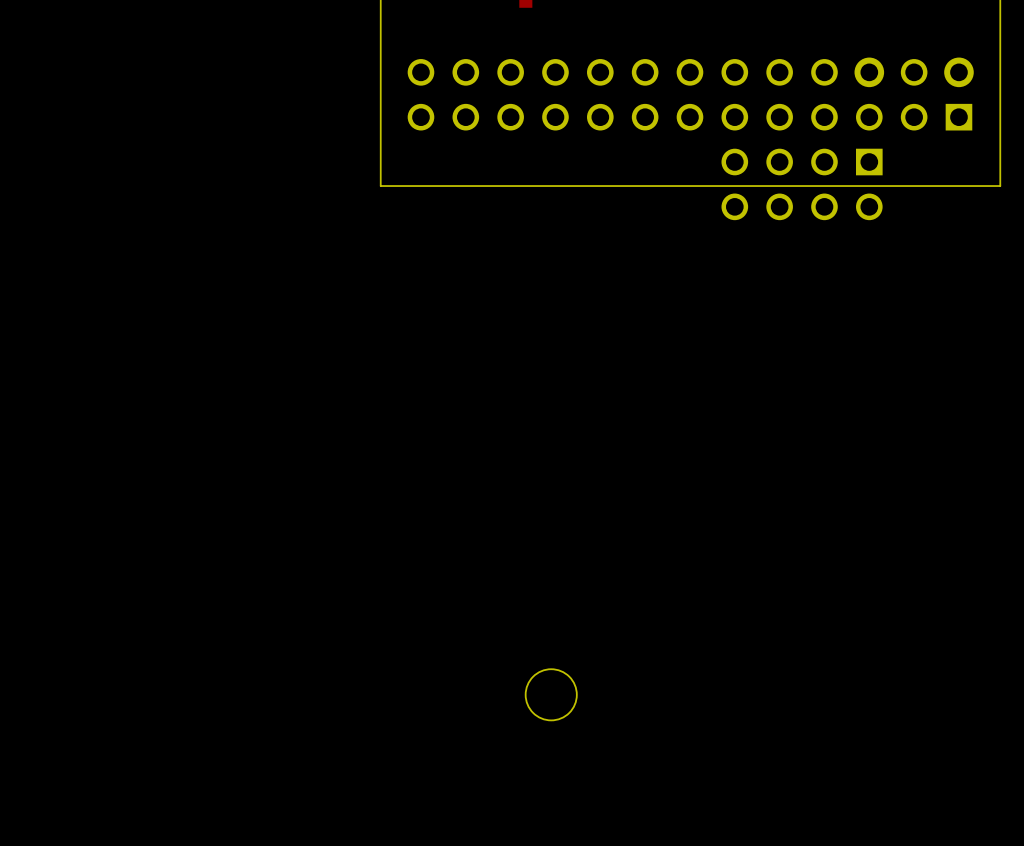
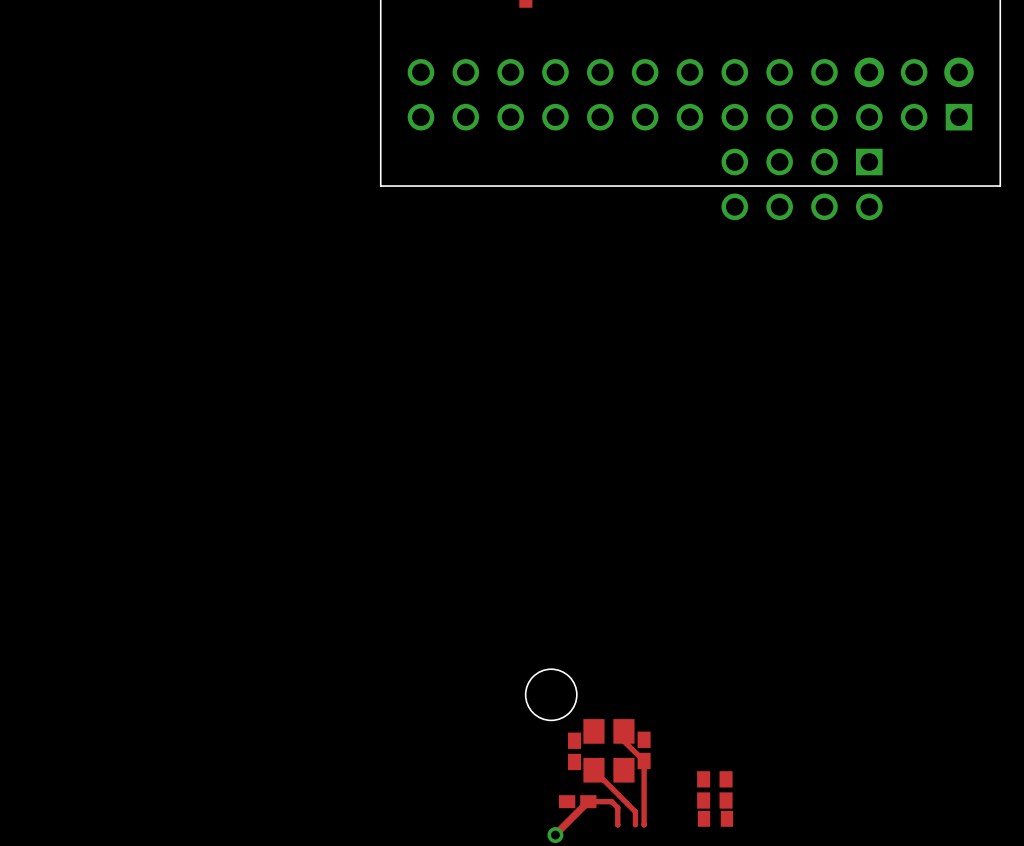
top track: none -> (623, 731) (623, 741) (644, 760) (644, 824)
part: none -> (608, 750)
part: none -> (644, 750)
part: none -> (574, 751)
top track: none -> (593, 770) (635, 811) (635, 824)
part: none -> (703, 789)
part: none -> (726, 789)
part: none -> (577, 801)
part: none -> (715, 818)
top track: none -> (617, 824) (617, 807) (611, 801) (588, 801) (554, 835)
via: none -> (555, 835)

